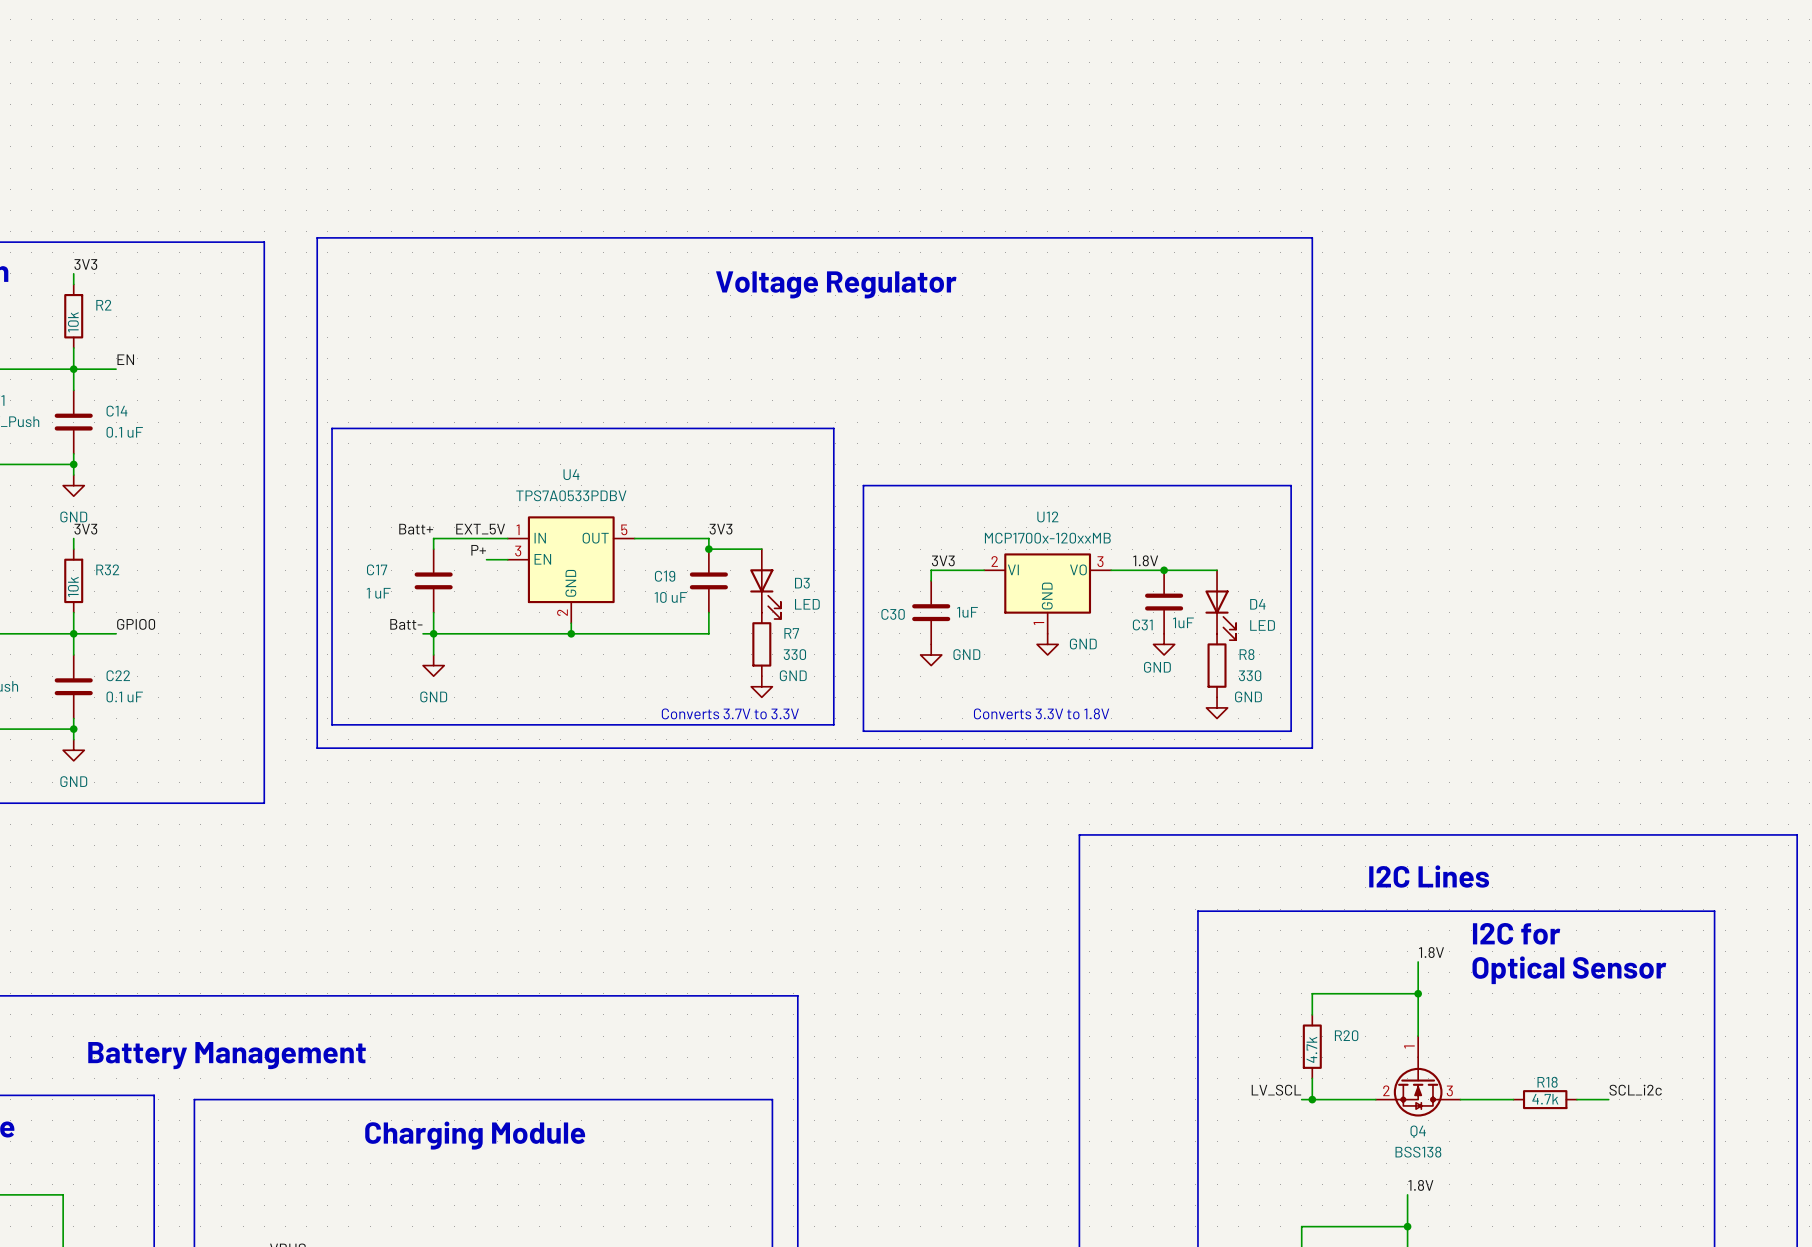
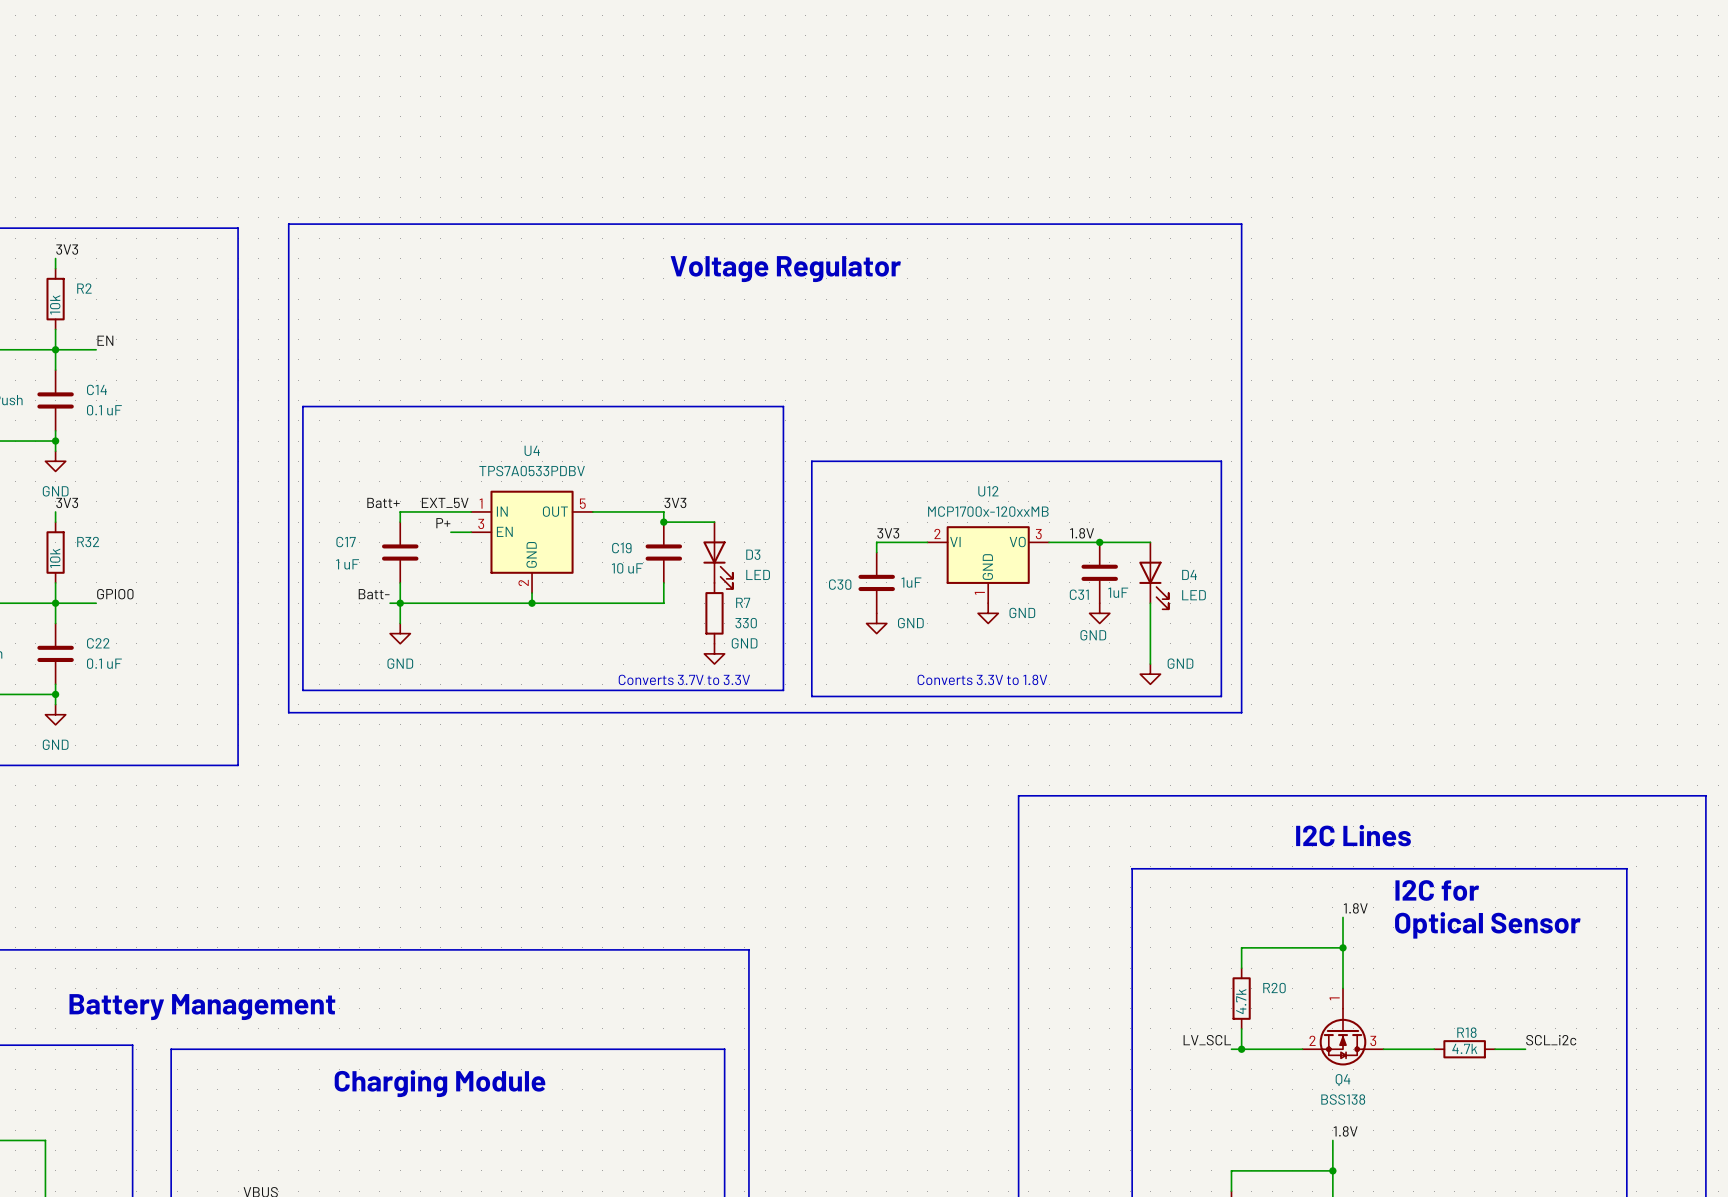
wire: none -> (1150, 603) (1150, 664)
R8: 330 (1217, 665) -> none

